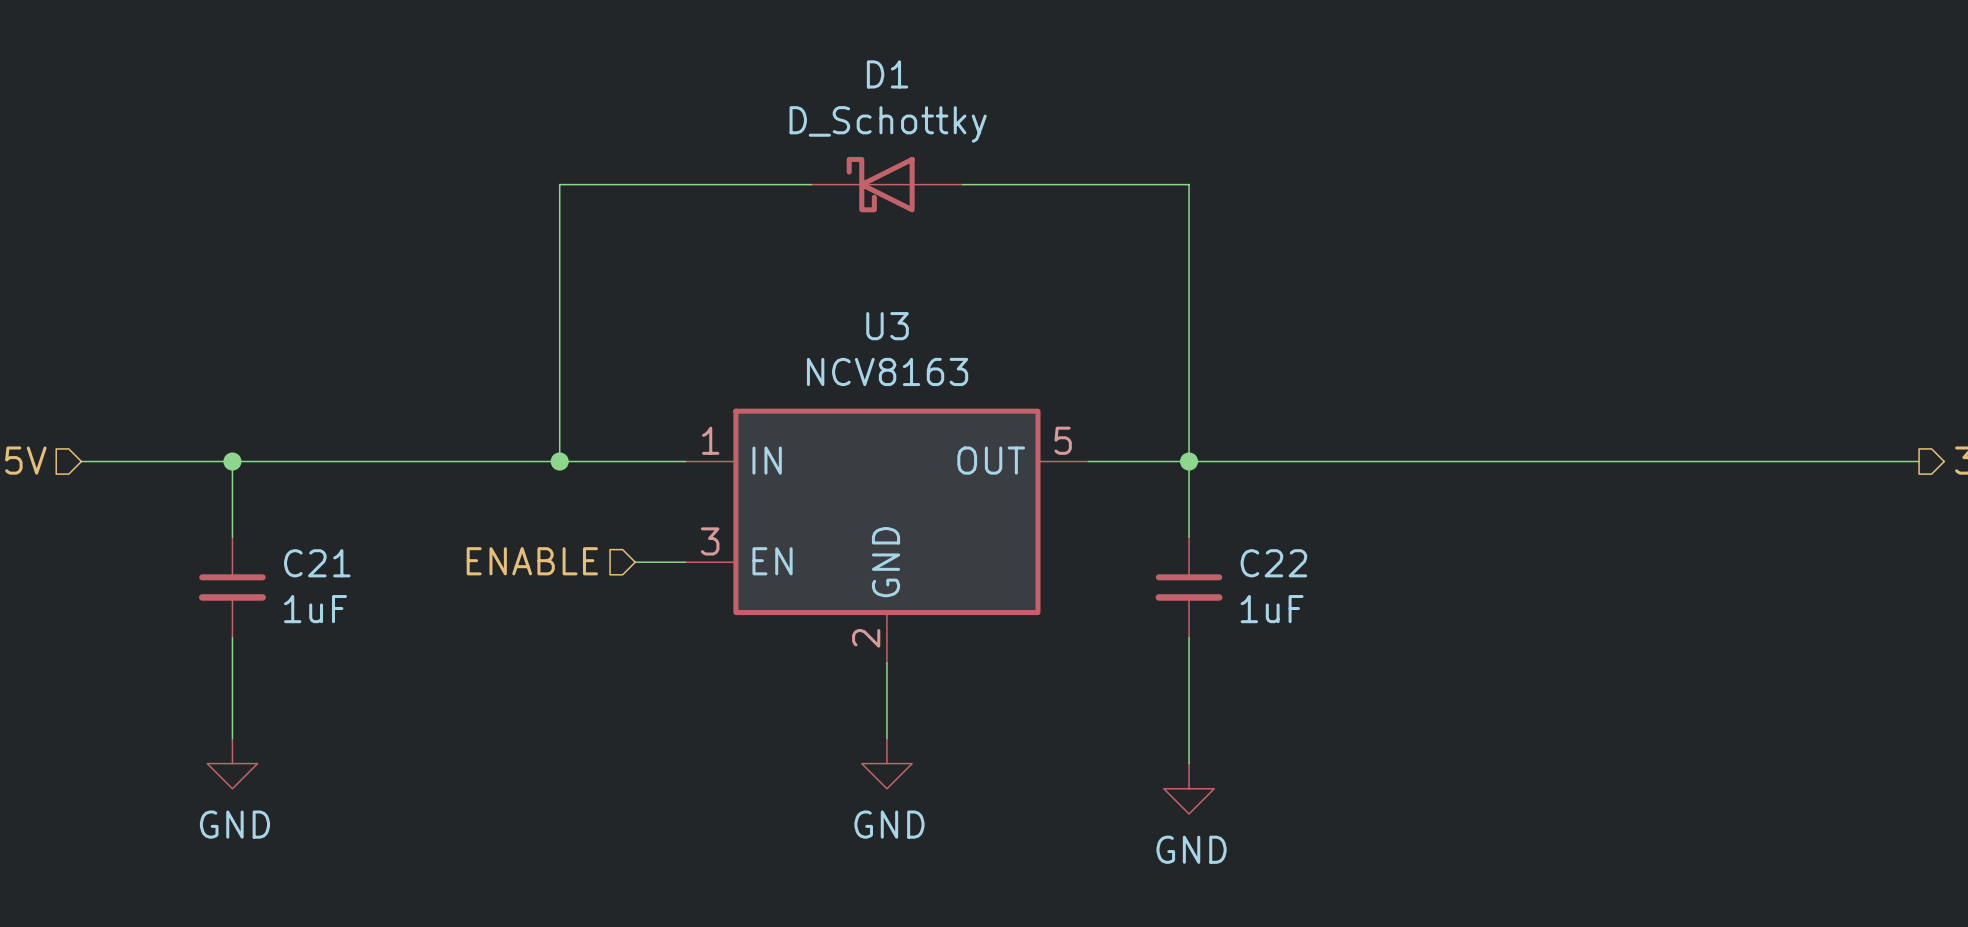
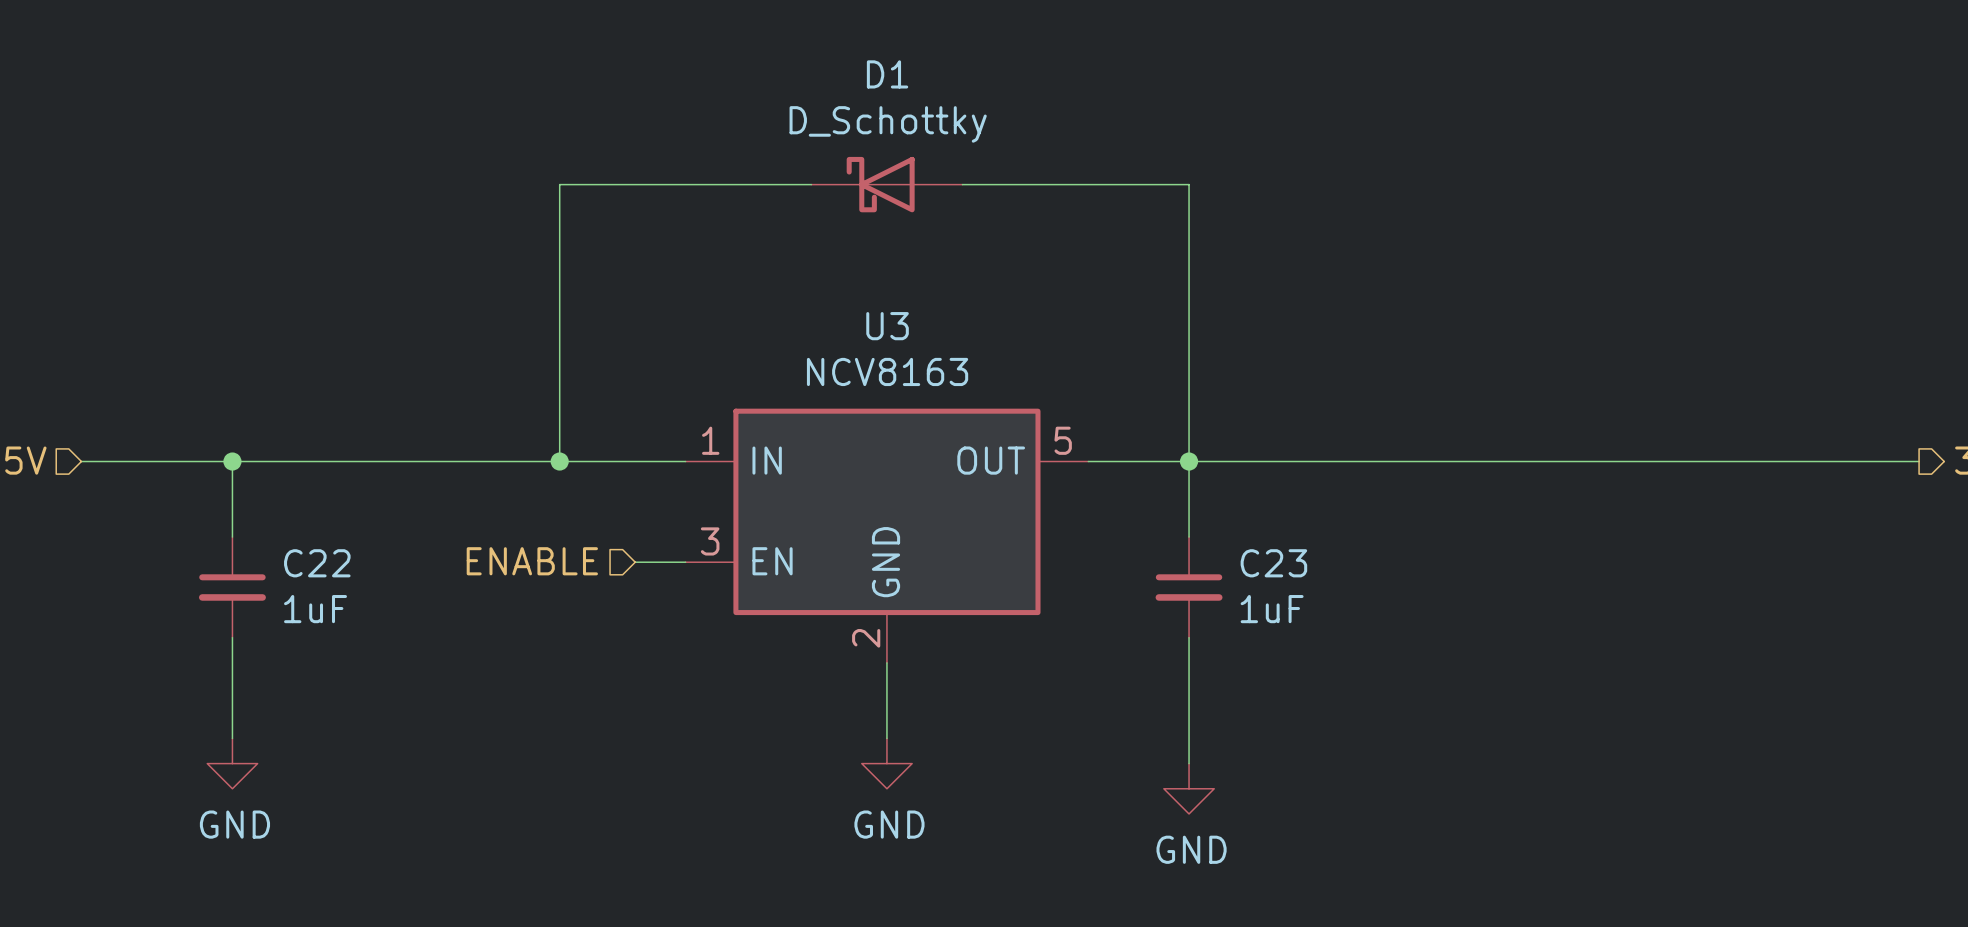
C21 name: C21 (317, 563) -> C22 (317, 563)
C22 name: C22 (1273, 563) -> C23 (1273, 563)

